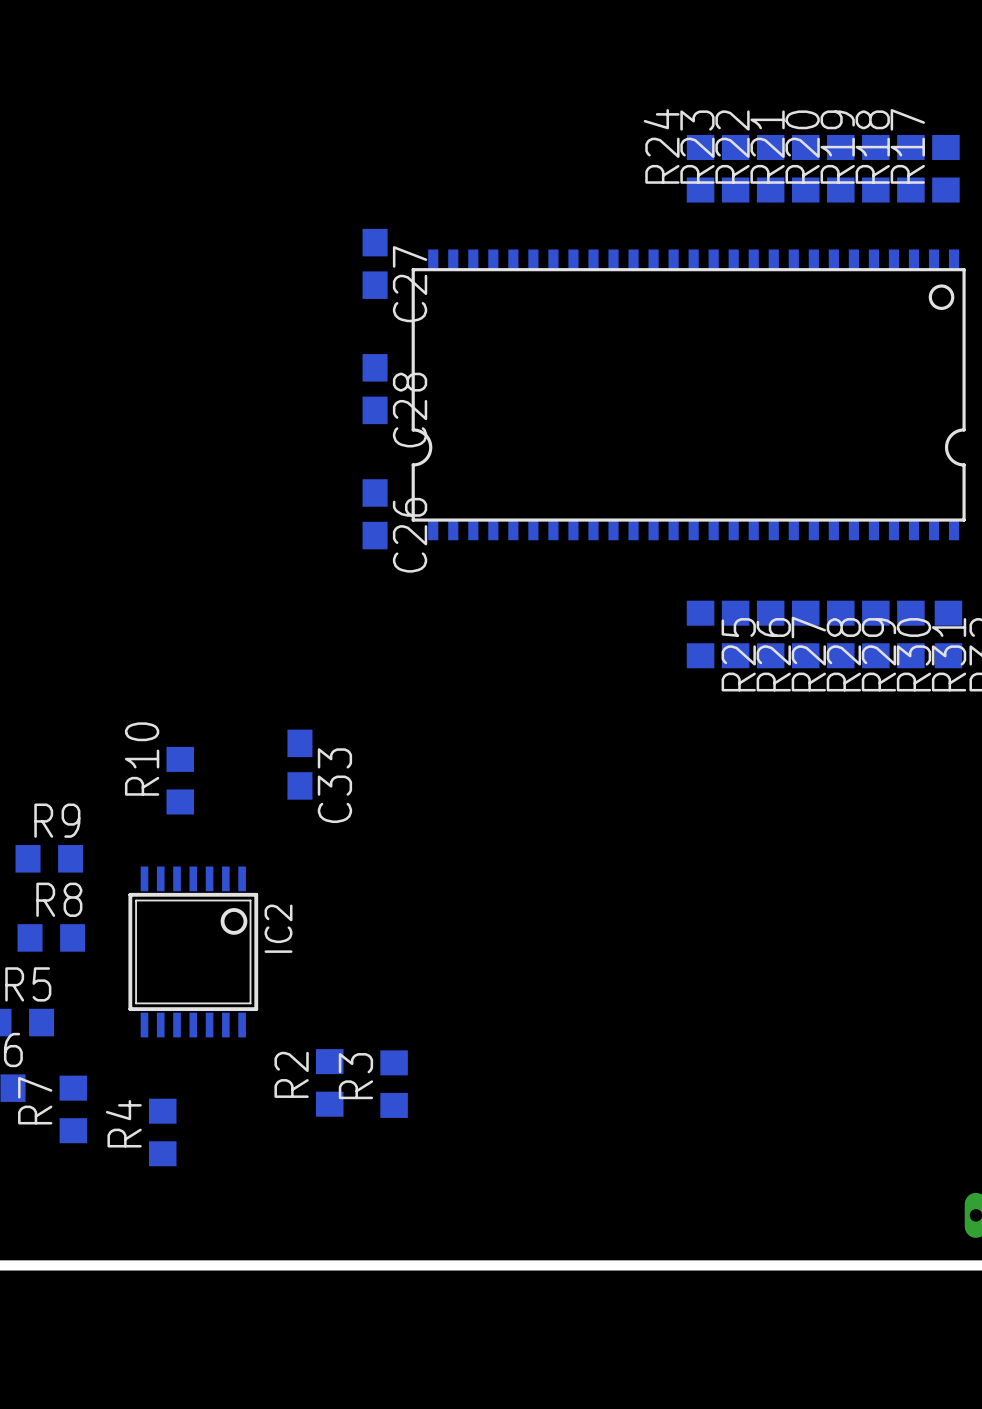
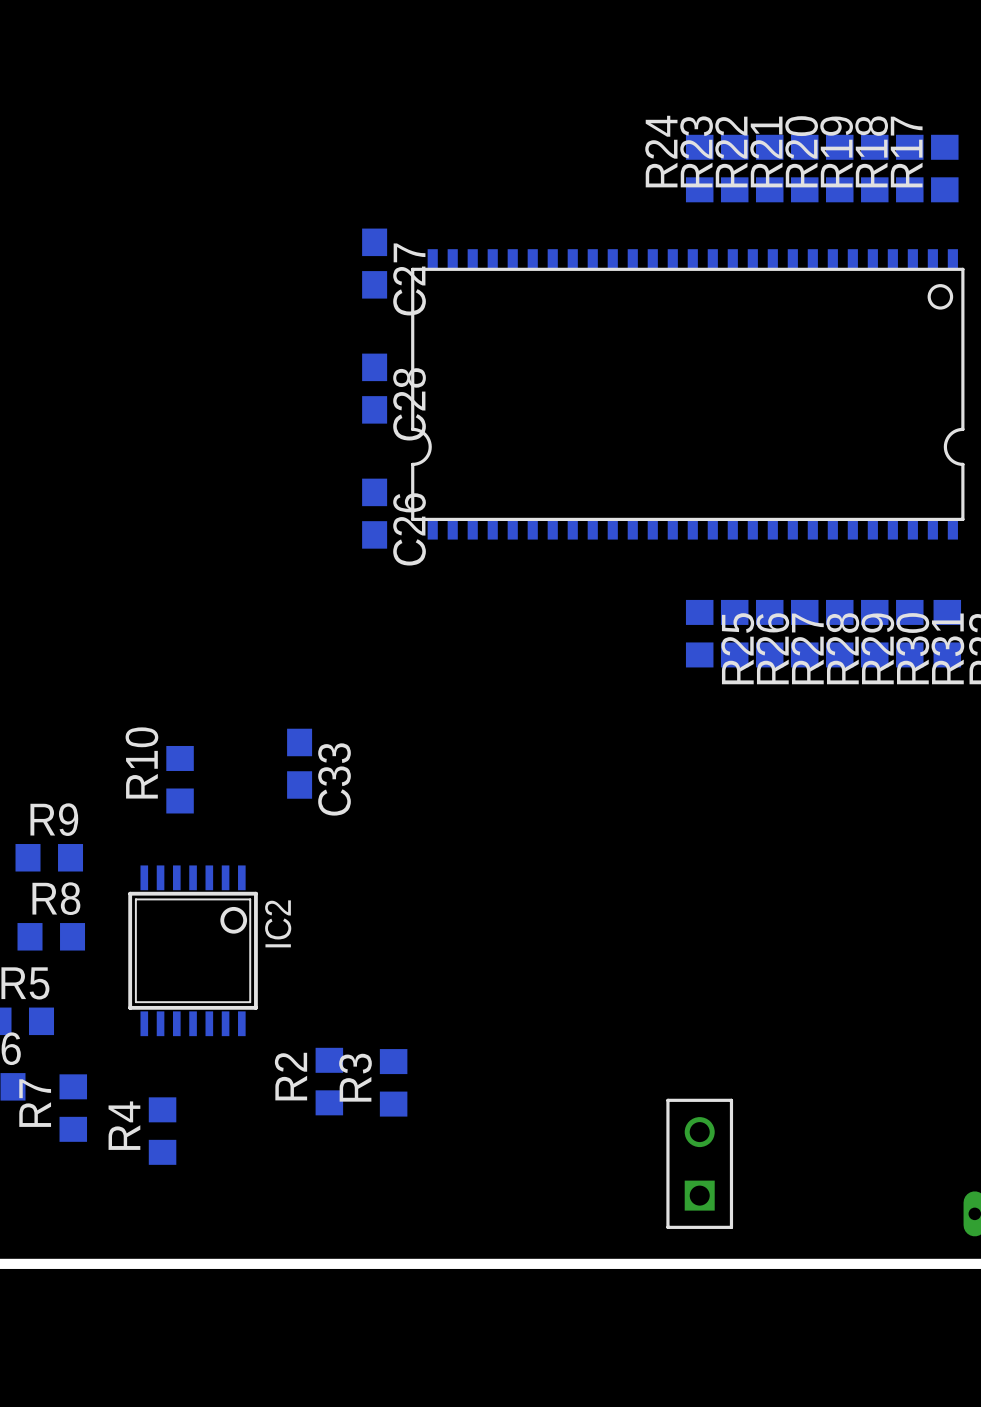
part: none -> (699, 1163)

